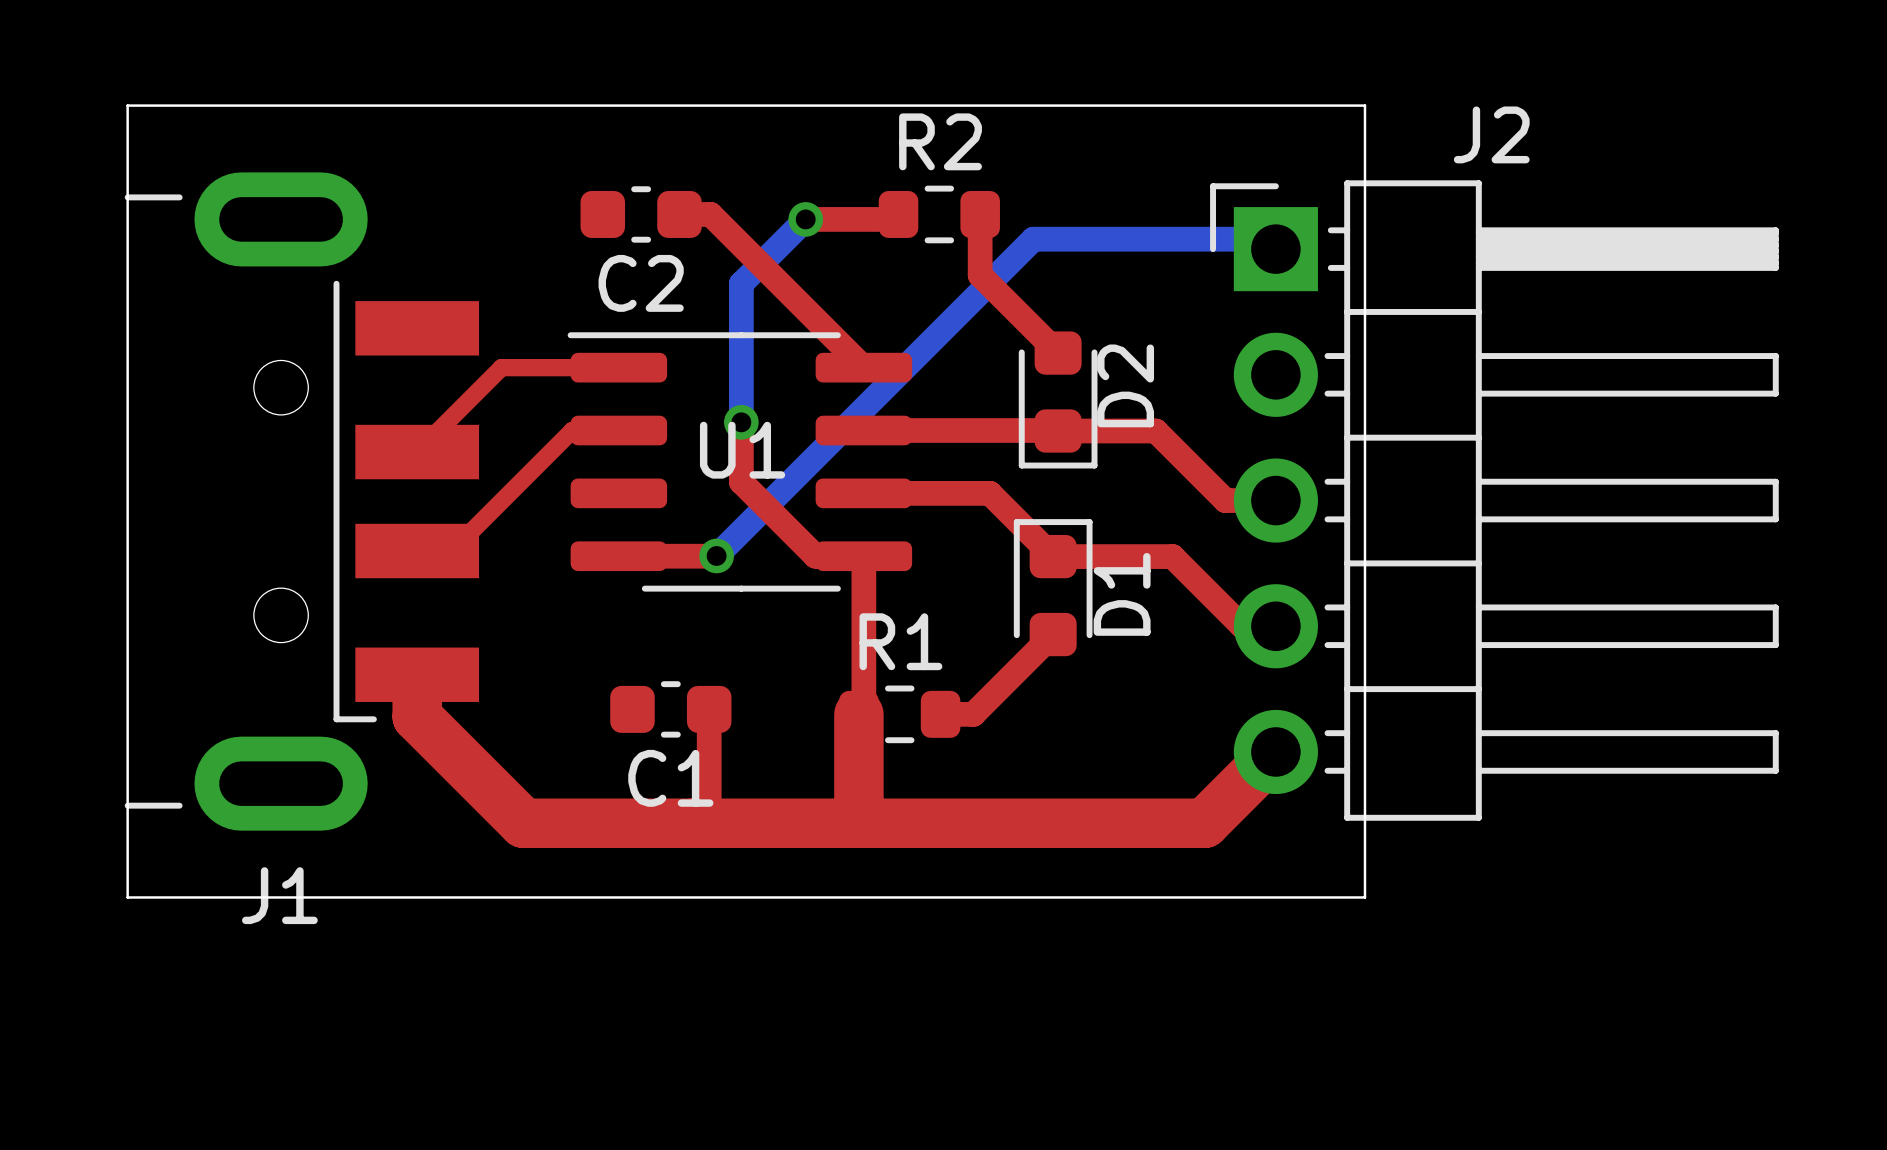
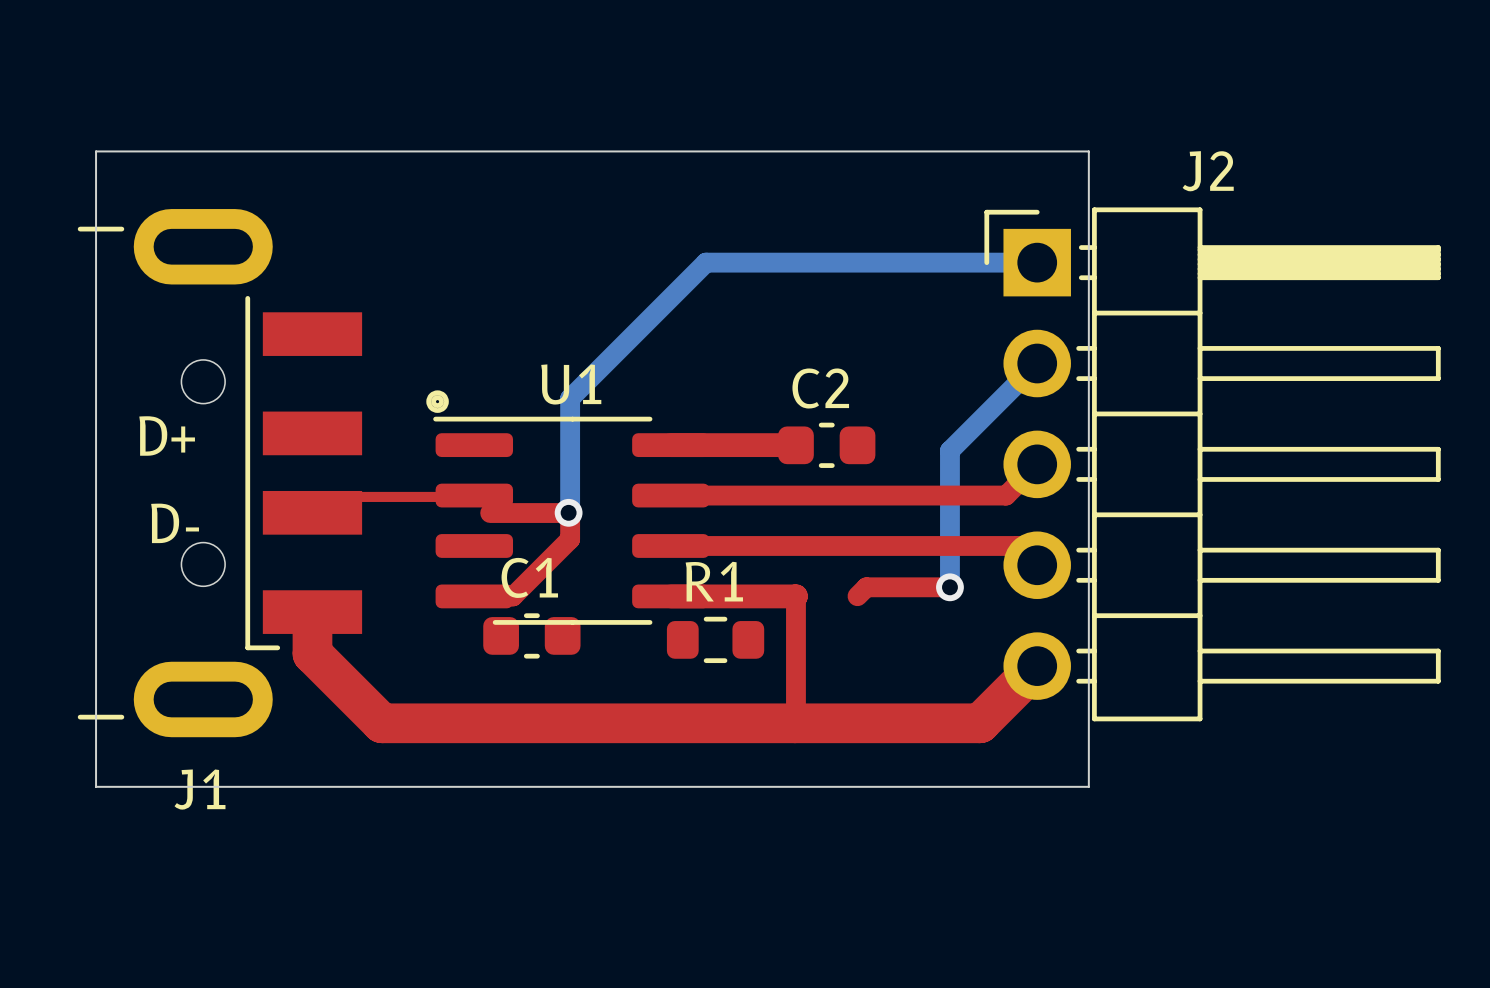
C2 position: (641, 214) -> (826, 445)
top track: (696, 214) (679, 214) (710, 214) (863, 367) -> none
top track: (898, 214) (893, 219) (805, 219) -> none
R2: (939, 214) -> none
top track: (980, 214) (980, 275) (1058, 353) -> none
bottom track: (805, 219) (741, 283) (741, 422) -> none
via: (805, 219) -> none
bottom track: none -> (1037, 262) (705, 262) (570, 398) (570, 509)
bottom track: (1275, 249) (1266, 239) (1033, 239) (716, 555) -> none
C2 name position: C2 (641, 283) -> C2 (820, 388)
top track: (618, 367) (501, 367) (417, 452) -> none
bottom track: none -> (1037, 363) (949, 450) (949, 587)
D2: (1058, 399) -> none
drawing: none -> [426, 390, 449, 413]
top track: (741, 422) (741, 481) (815, 556) (863, 556) (863, 709) (858, 714) (858, 814) (850, 823) -> none
via: (741, 422) -> none
top track: (618, 430) (572, 430) (451, 551) (417, 551) -> none
top track: (863, 430) (1057, 430) -> none
top track: (1058, 431) (1155, 431) (1225, 500) (1275, 500) -> none
U1 name position: U1 (742, 450) -> U1 (571, 384)
text: none -> D+ (167, 436)
U1 position: (739, 461) -> (571, 520)
top track: none -> (670, 445) (795, 445)
top track: (863, 493) (989, 493) (1053, 556) (1172, 556) (1242, 626) (1275, 626) -> none
top track: none -> (1037, 464) (1006, 495) (670, 495)
J2 position: (1494, 500) -> (1212, 464)
J1 position: (301, 501) -> (219, 473)
top track: none -> (474, 495) (328, 496) (312, 512)
top track: none -> (570, 509) (570, 539) (513, 596) (474, 596)
text: none -> D- (175, 523)
D1: (1053, 587) -> none
top track: none -> (670, 545) (1017, 545) (1037, 565)
top track: (1053, 634) (973, 714) (940, 714) -> none
top track: none -> (949, 587) (866, 587) (857, 596)
via: none -> (949, 587)
top track: none -> (670, 596) (795, 596) (794, 723)
top track: (417, 674) (417, 716) (523, 823) (1204, 823) (1275, 751) -> none
top track: none -> (312, 612) (312, 653) (381, 723) (980, 723) (1037, 666)
top track: (709, 709) (709, 805) (691, 823) -> none
C1 name position: C1 (670, 778) -> C1 (529, 577)

